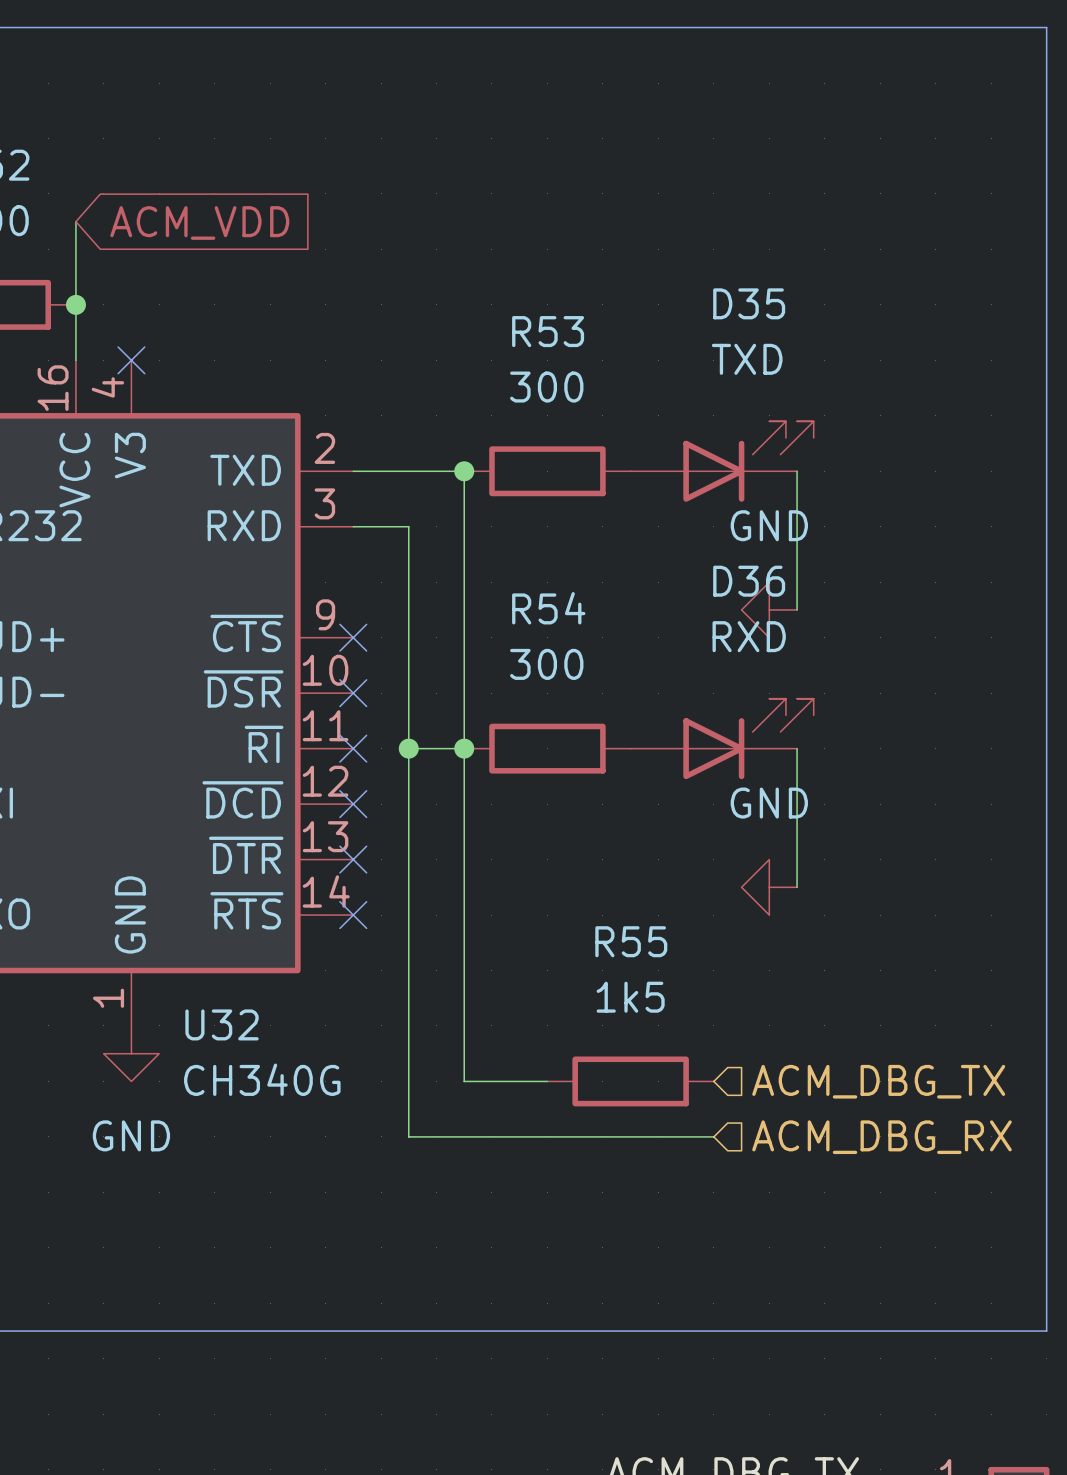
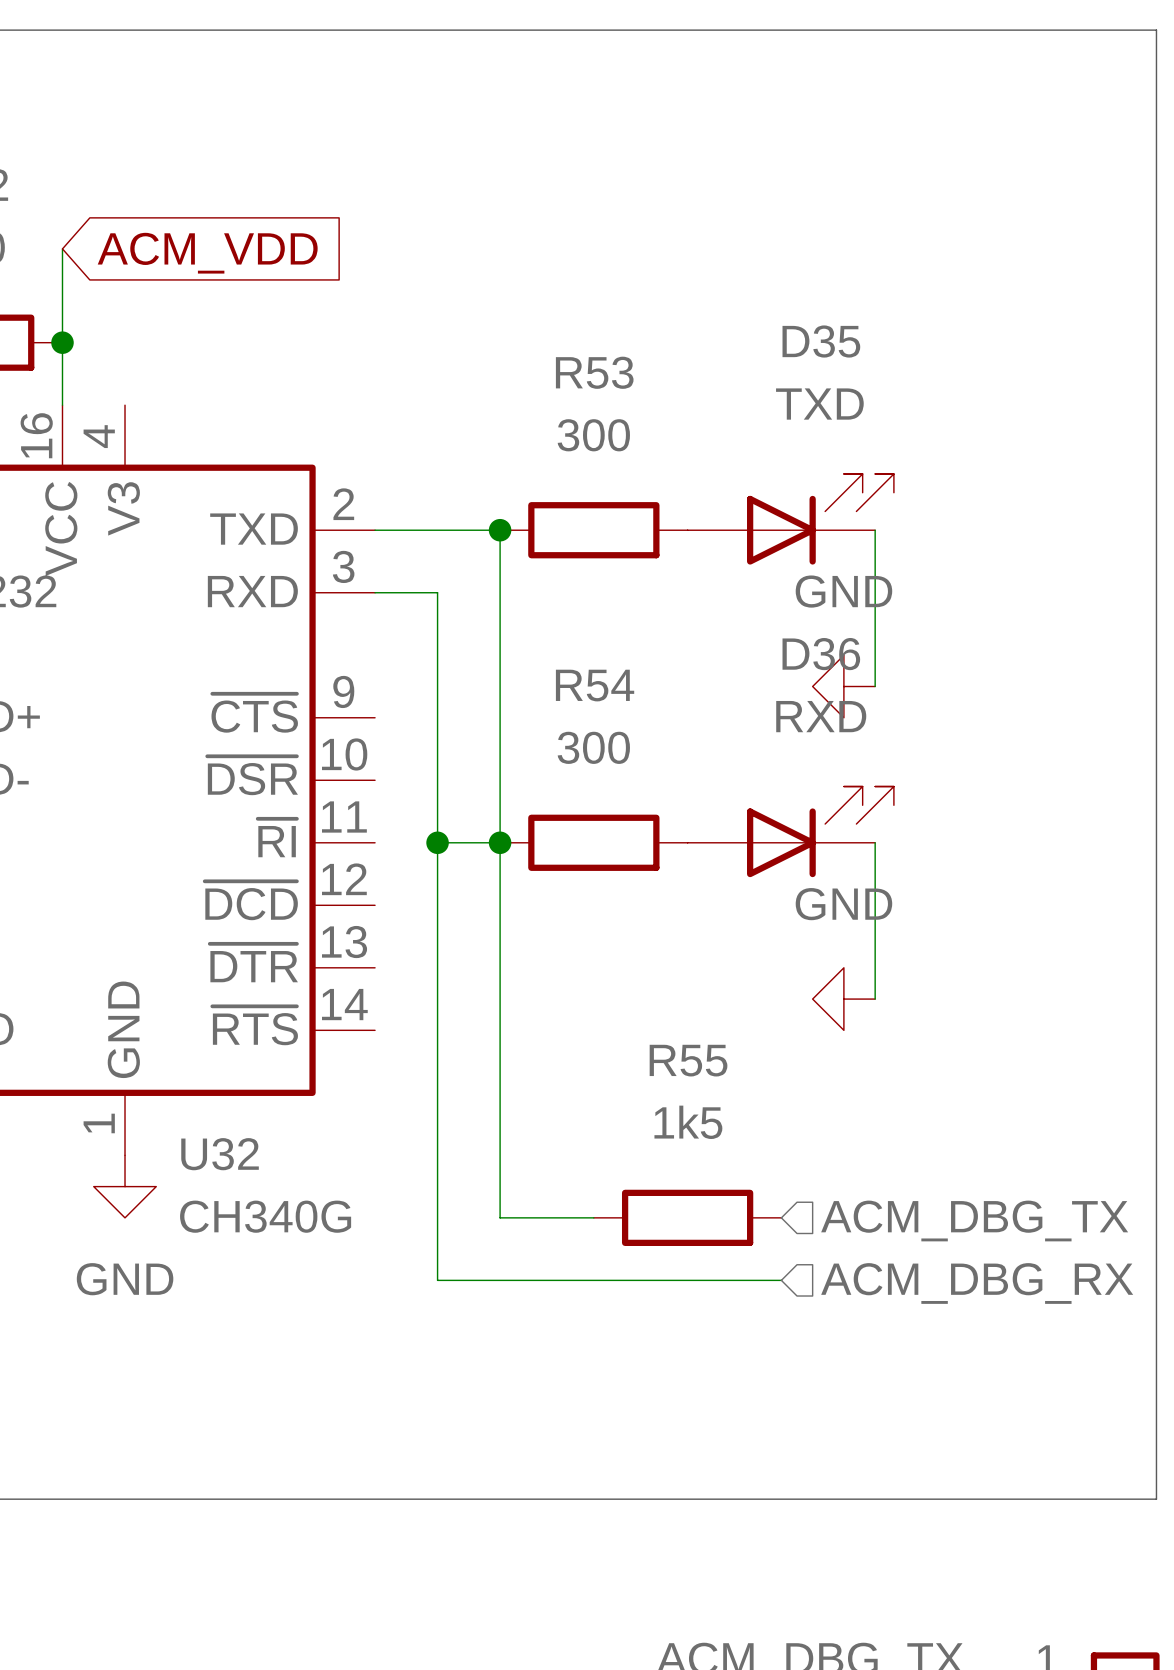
no-connect mark: (131, 360) -> none
no-connect mark: (353, 637) -> none
no-connect mark: (353, 693) -> none
no-connect mark: (353, 748) -> none
no-connect mark: (353, 804) -> none
no-connect mark: (353, 859) -> none
no-connect mark: (353, 915) -> none

